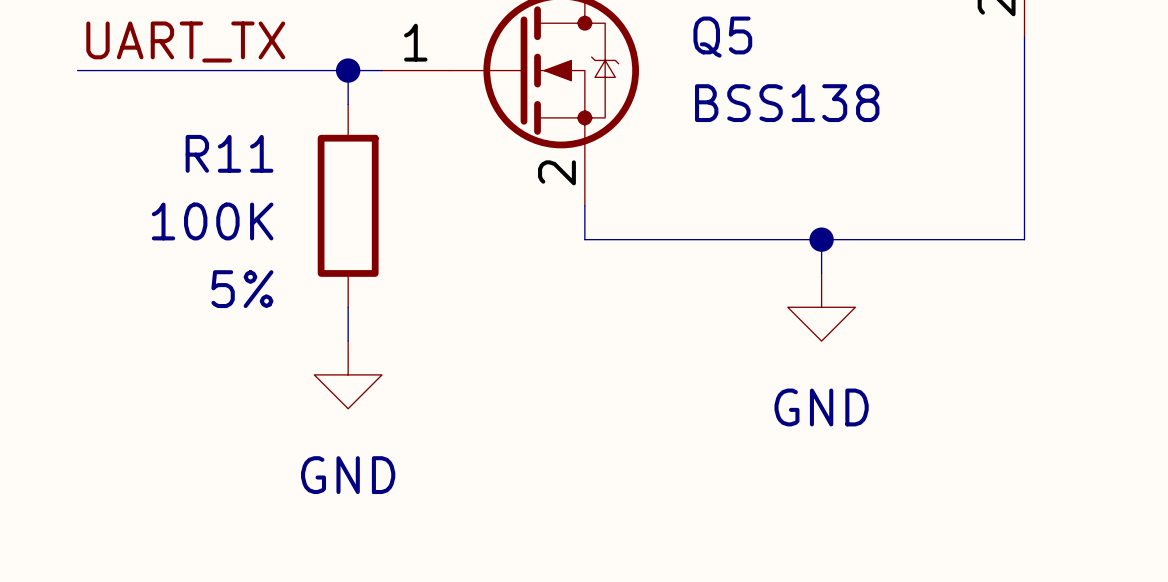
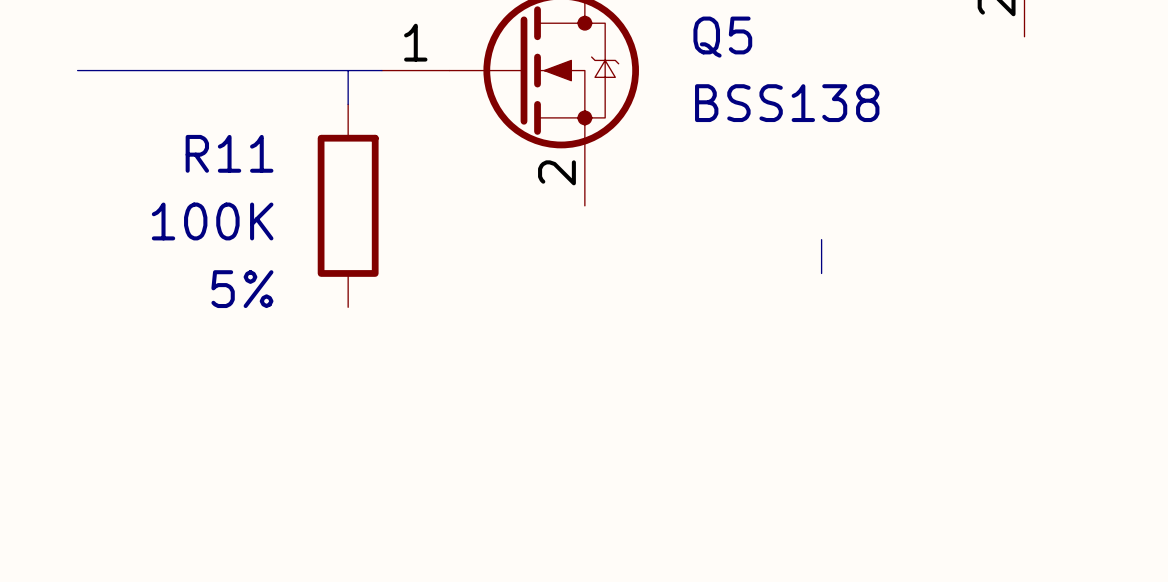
wire: (1024, 36) (1024, 239) (584, 239) (584, 205) -> none
label: UART_TX (185, 42) -> none
junction: (348, 70) -> none
junction: (821, 239) -> none
wire: (348, 307) (348, 341) -> none
power symbol: GND (821, 307) -> none
power symbol: GND (348, 374) -> none

